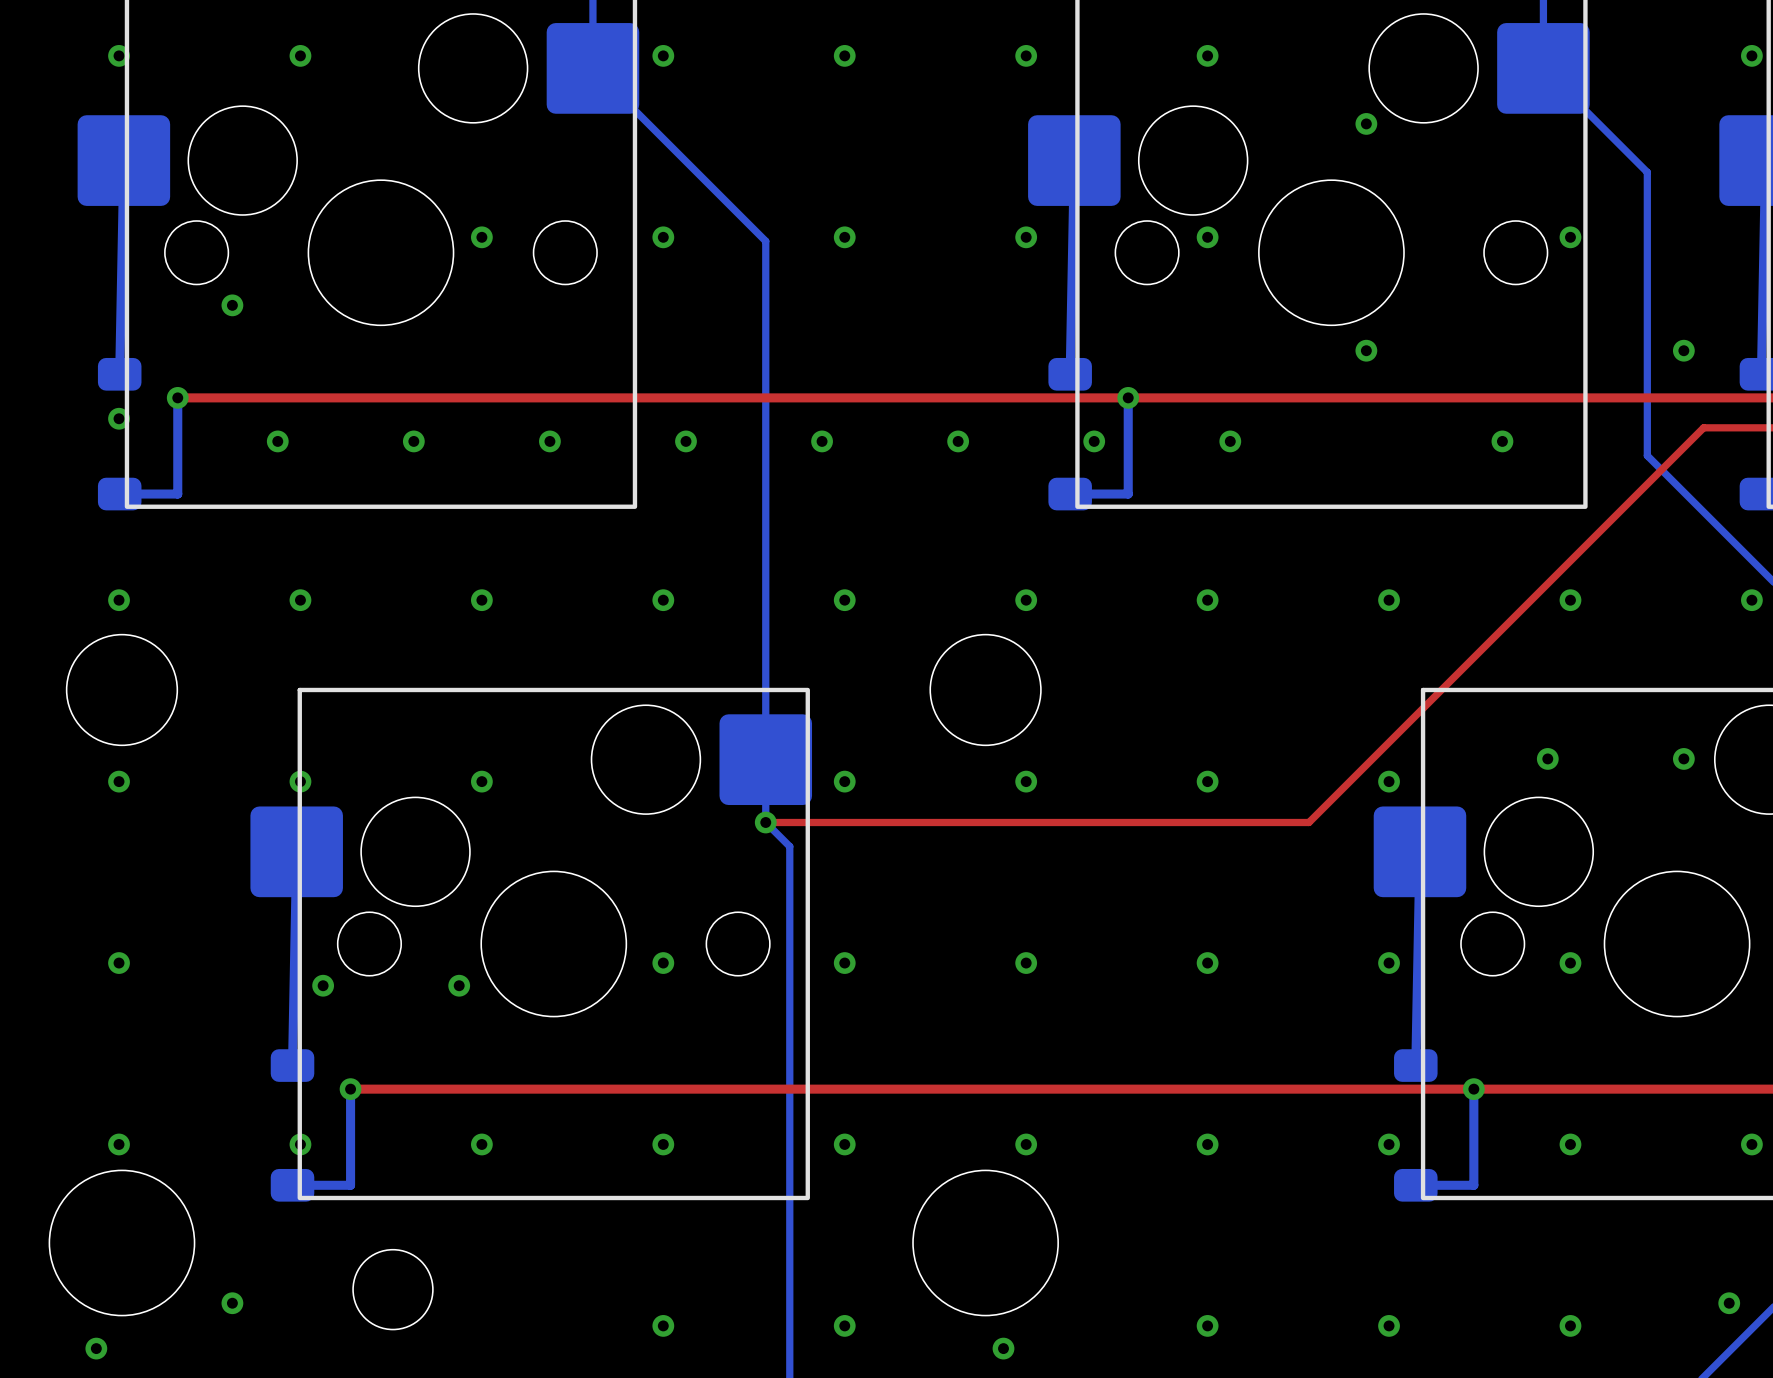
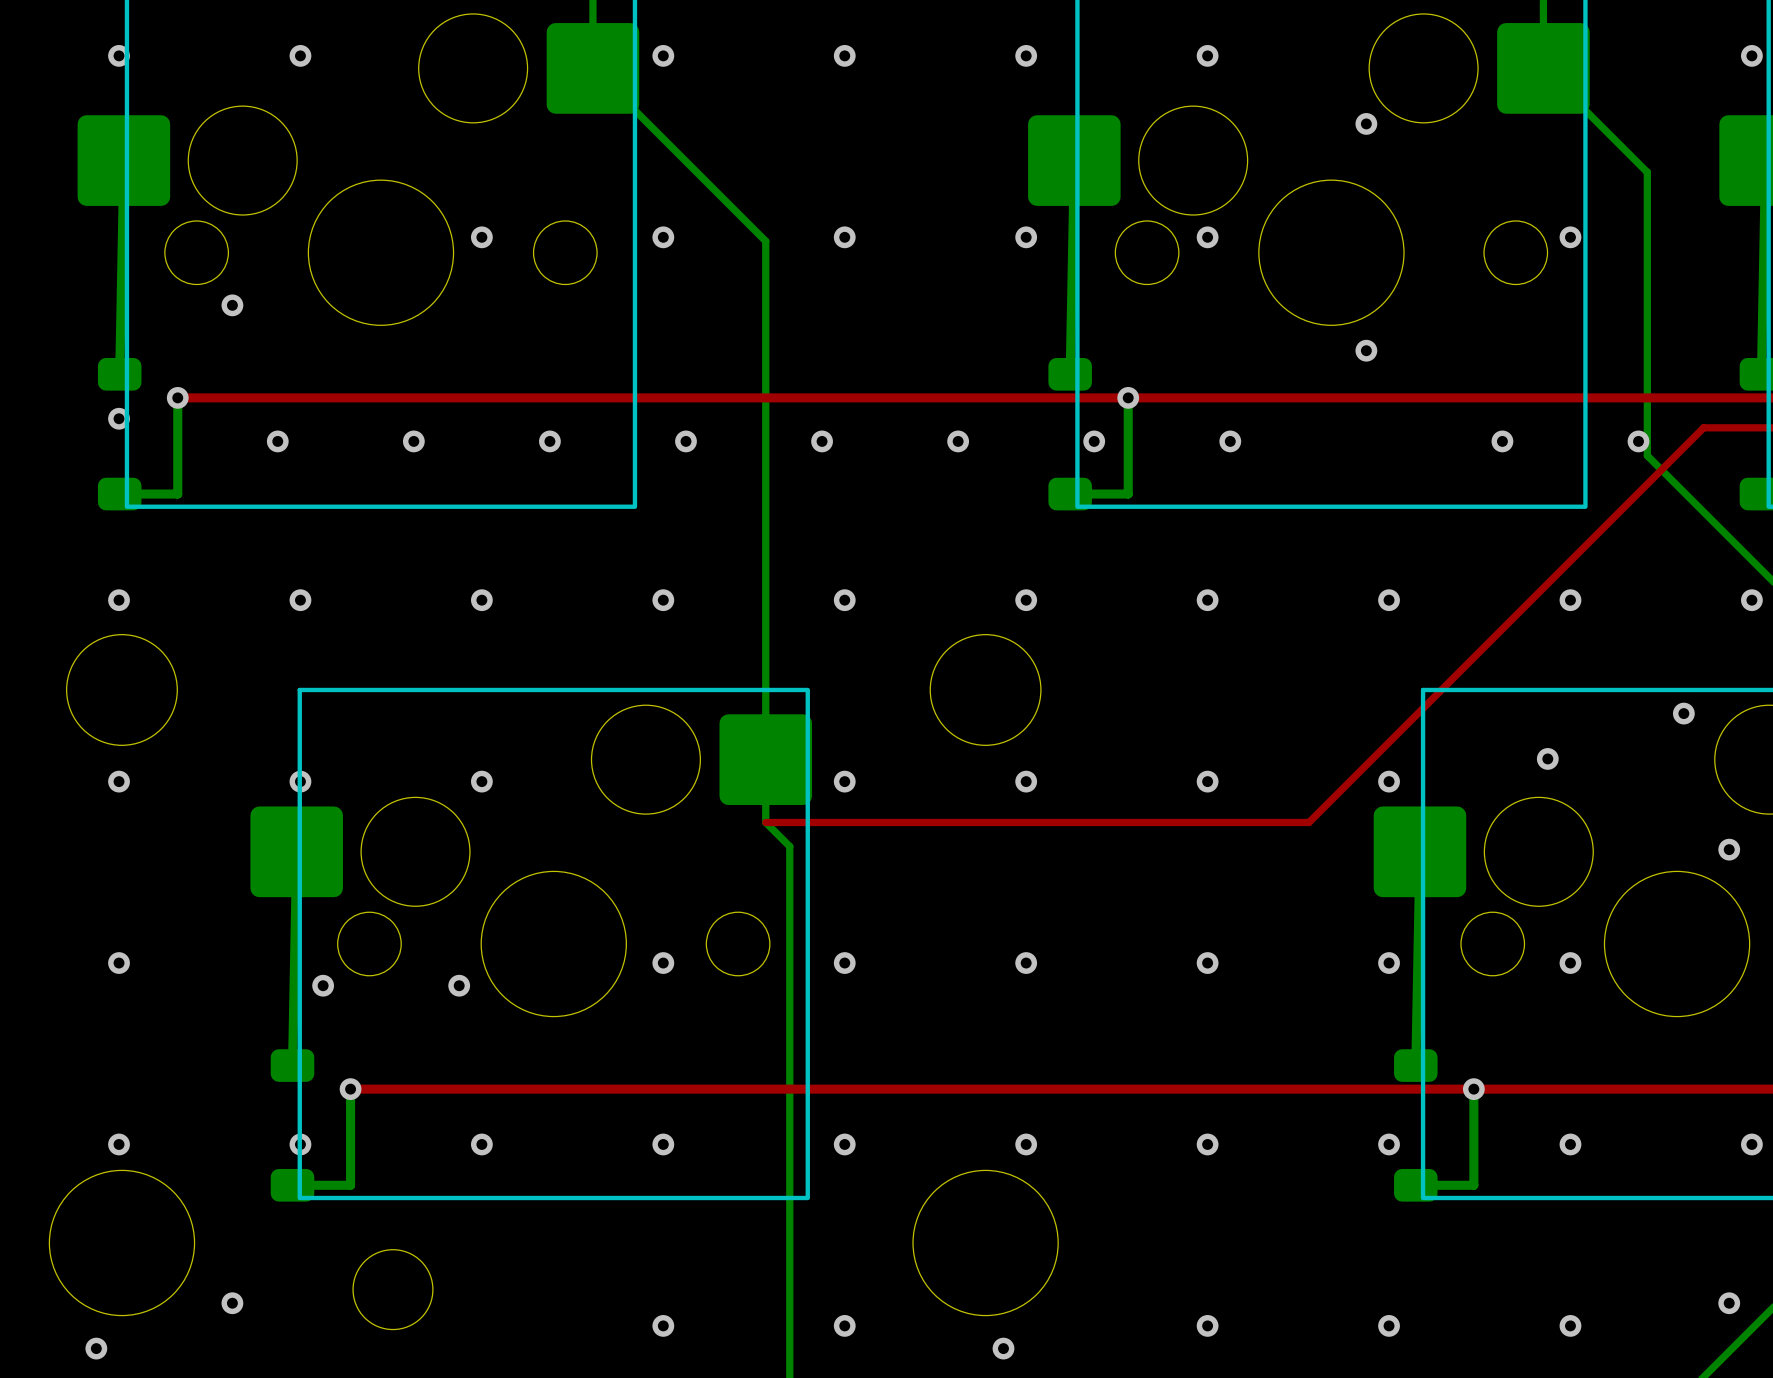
via position: (1683, 350) -> (1638, 441)
via position: (1683, 758) -> (1683, 713)
via: (765, 822) -> none
via: none -> (1729, 849)

